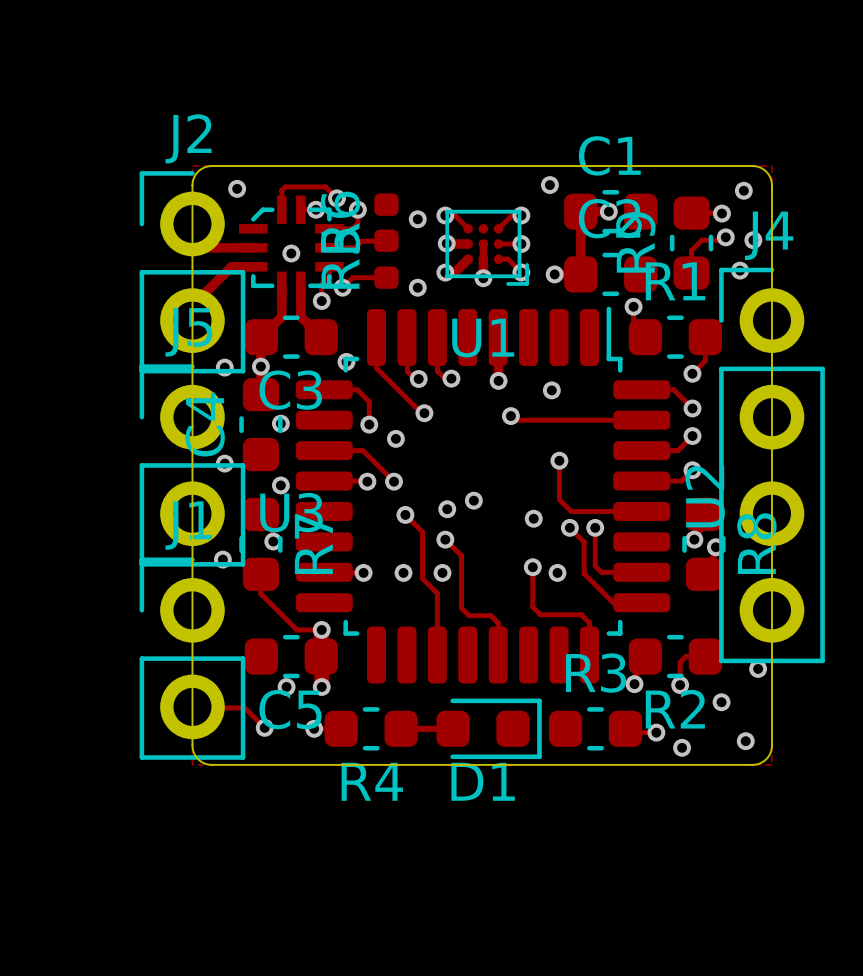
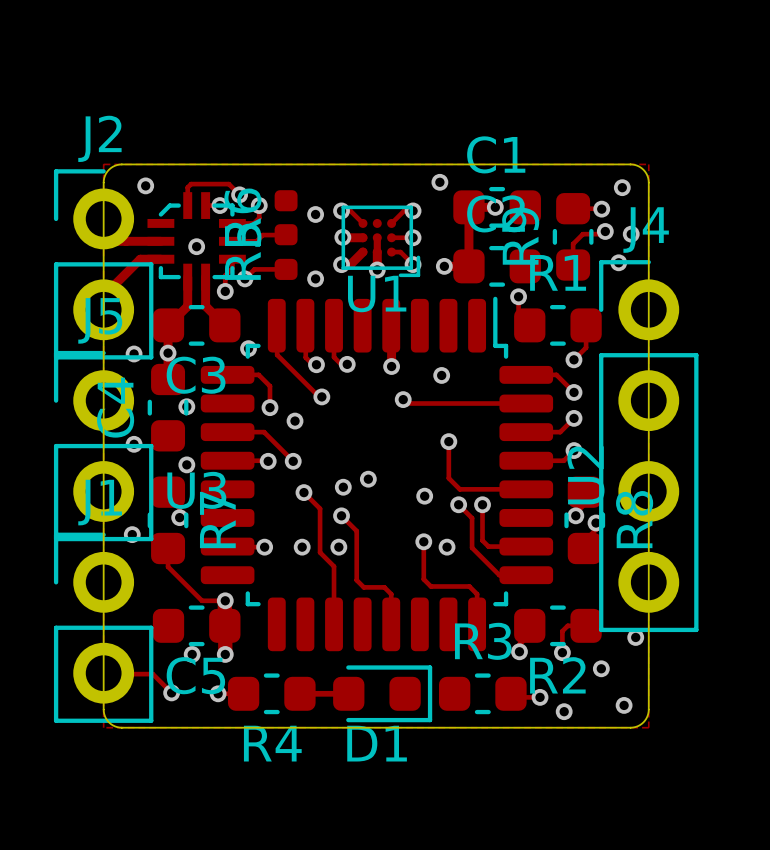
U1 name position: U1 (483, 338) -> U1 (377, 293)

